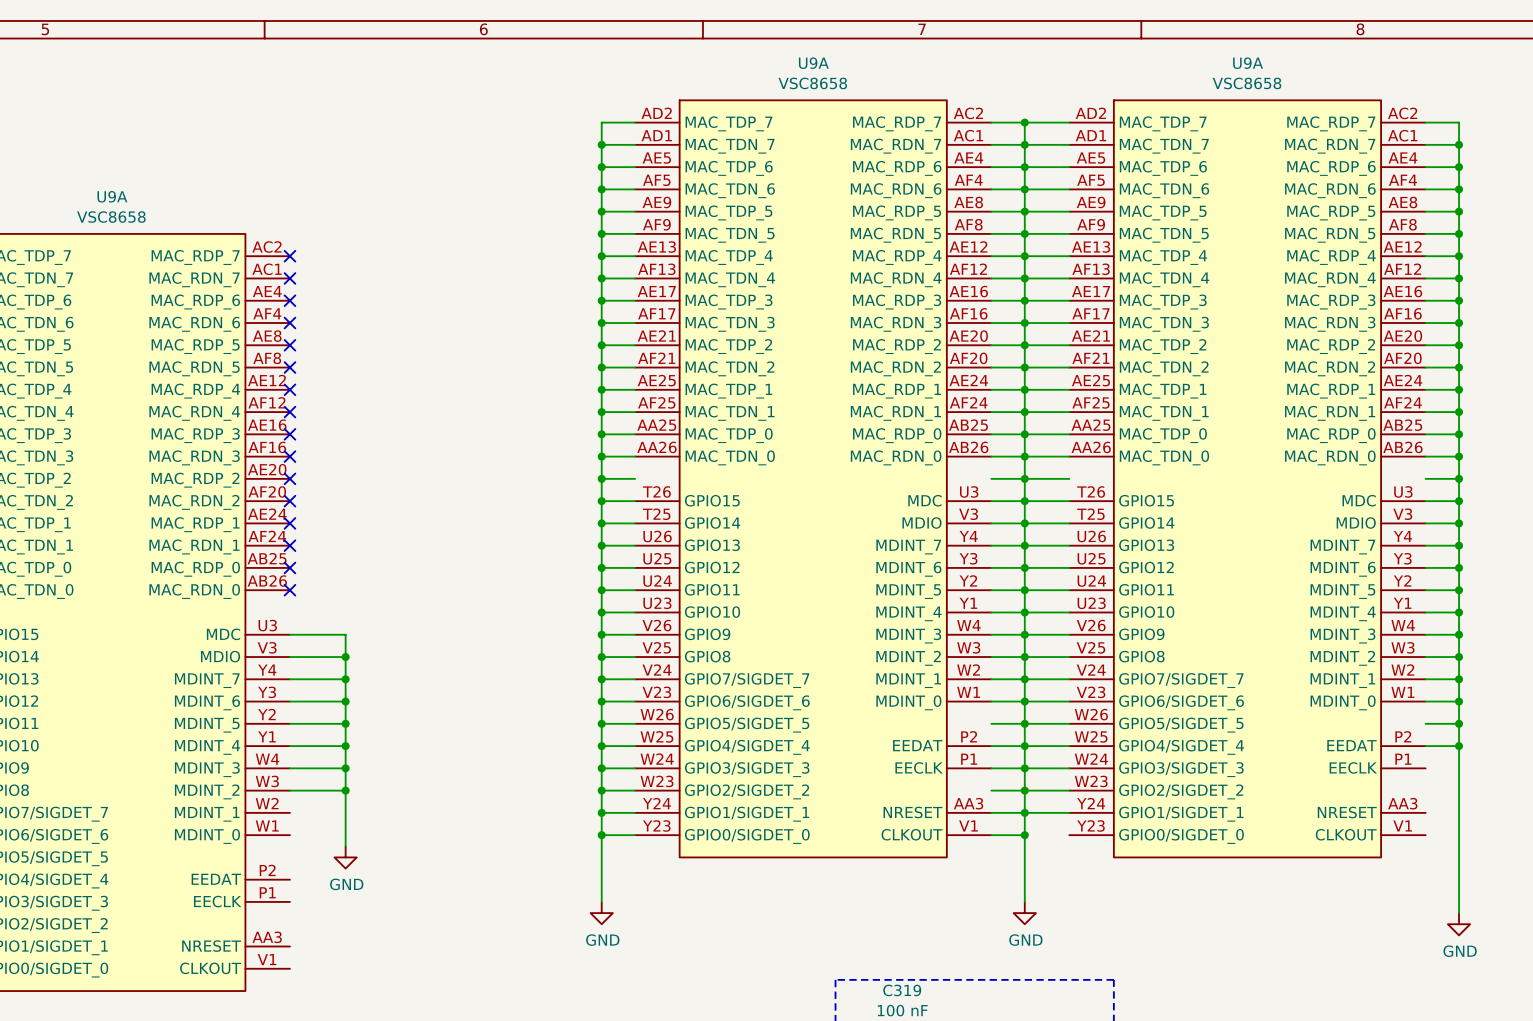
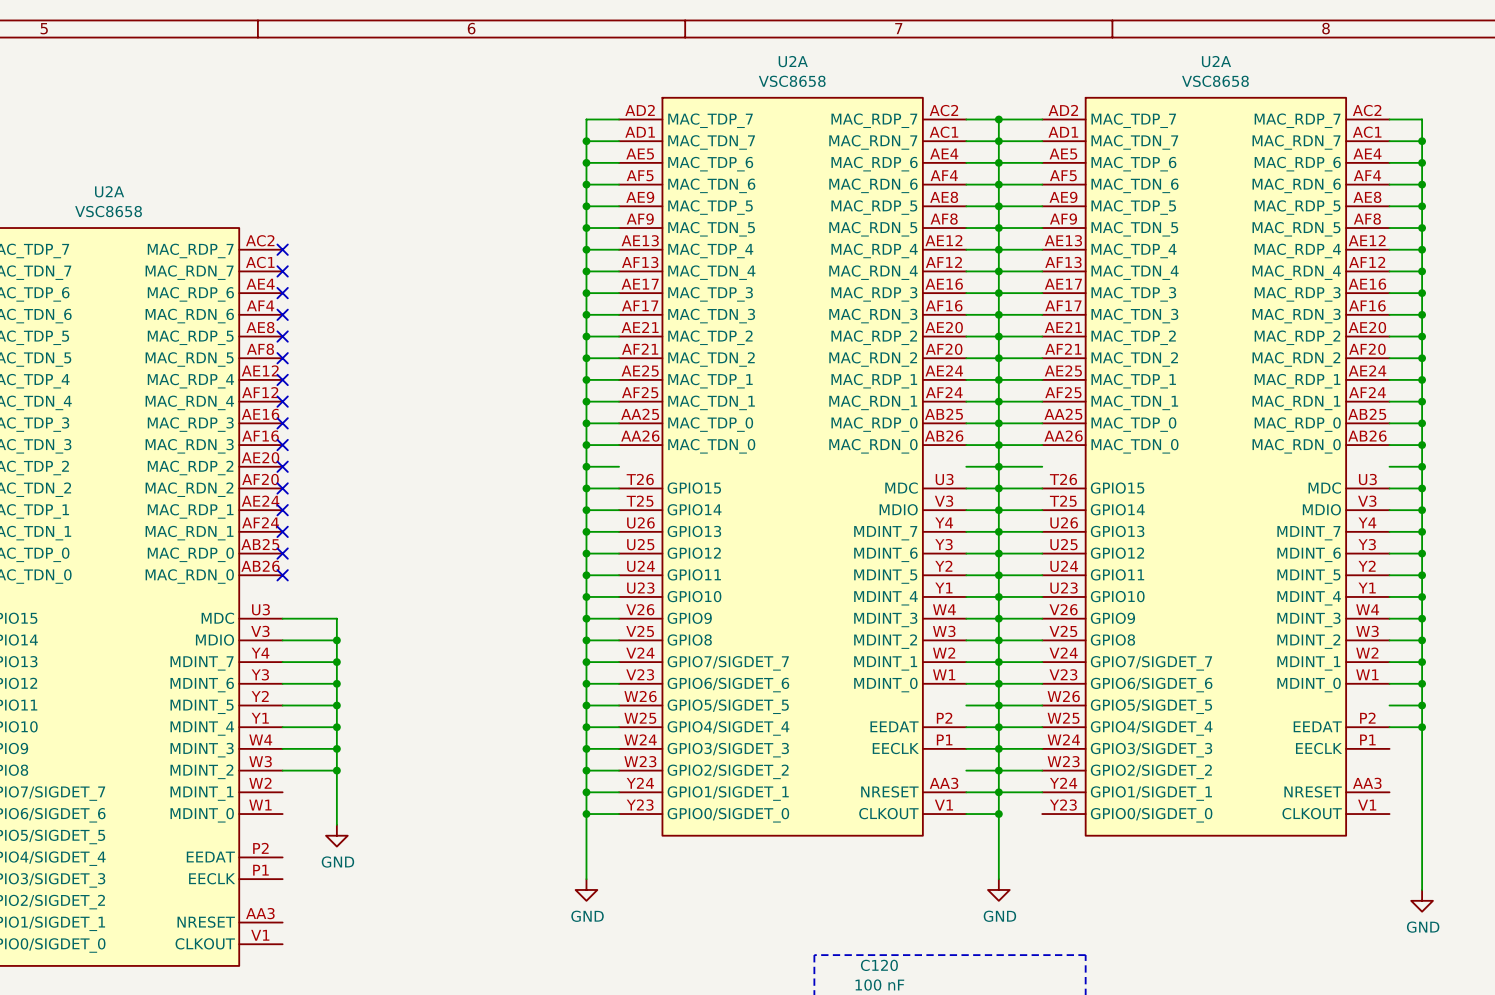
U9A name: U9A (813, 63) -> U2A (793, 61)
U9A name: U9A (1248, 63) -> U2A (1216, 61)
U9A name: U9A (112, 196) -> U2A (109, 191)
C319 name: C319 (902, 990) -> C120 (879, 965)

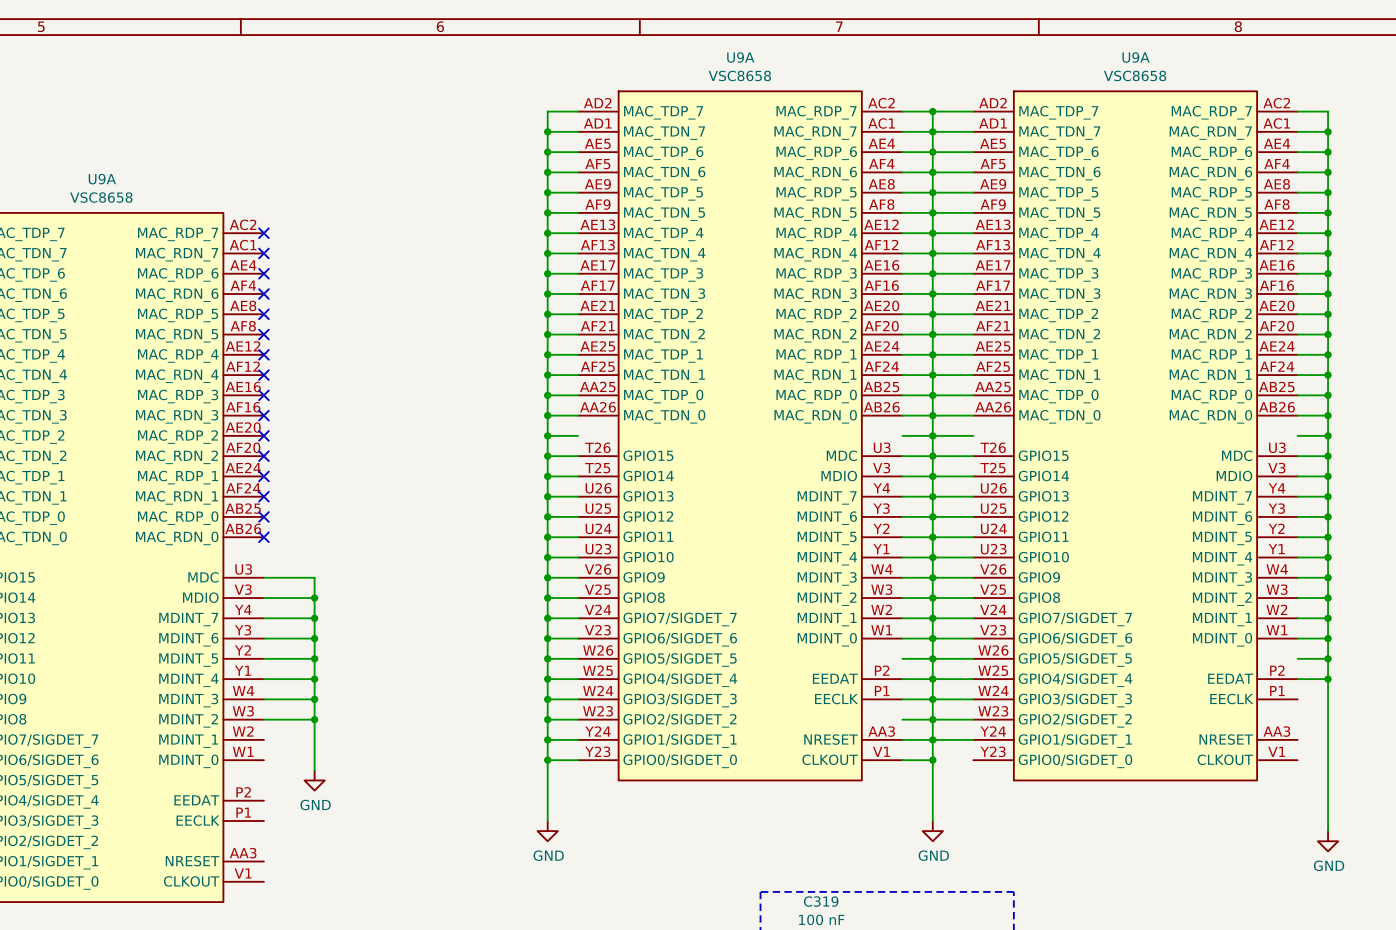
U2A name: U2A (793, 61) -> U9A (740, 57)
U2A name: U2A (1216, 61) -> U9A (1136, 57)
U2A name: U2A (109, 191) -> U9A (102, 179)
C120 name: C120 (879, 965) -> C319 (821, 901)

